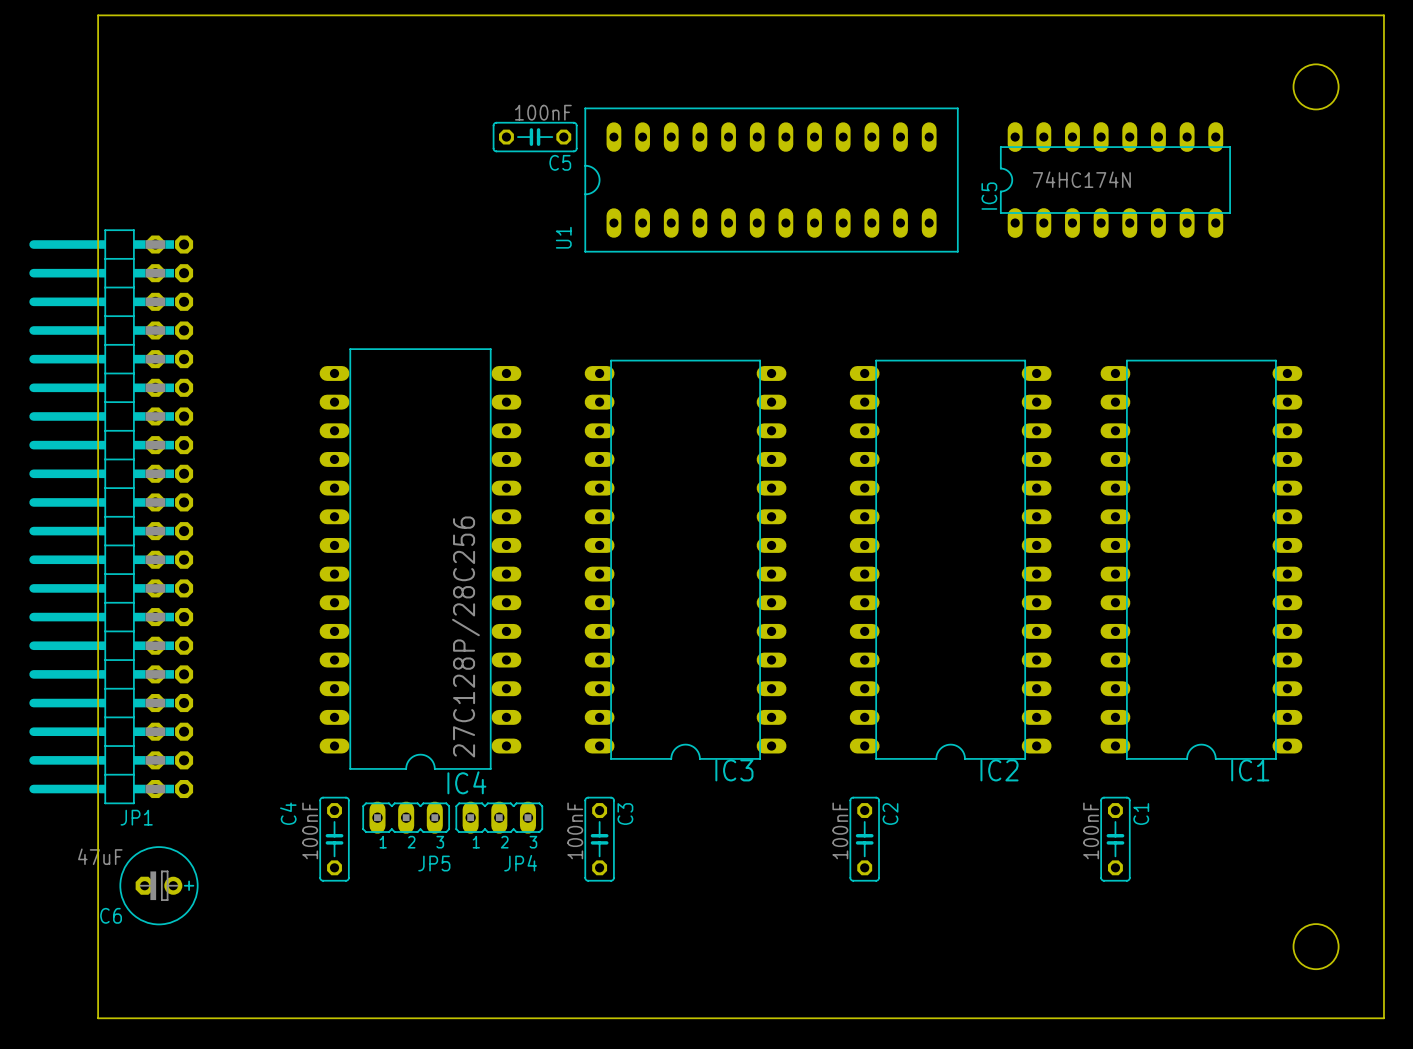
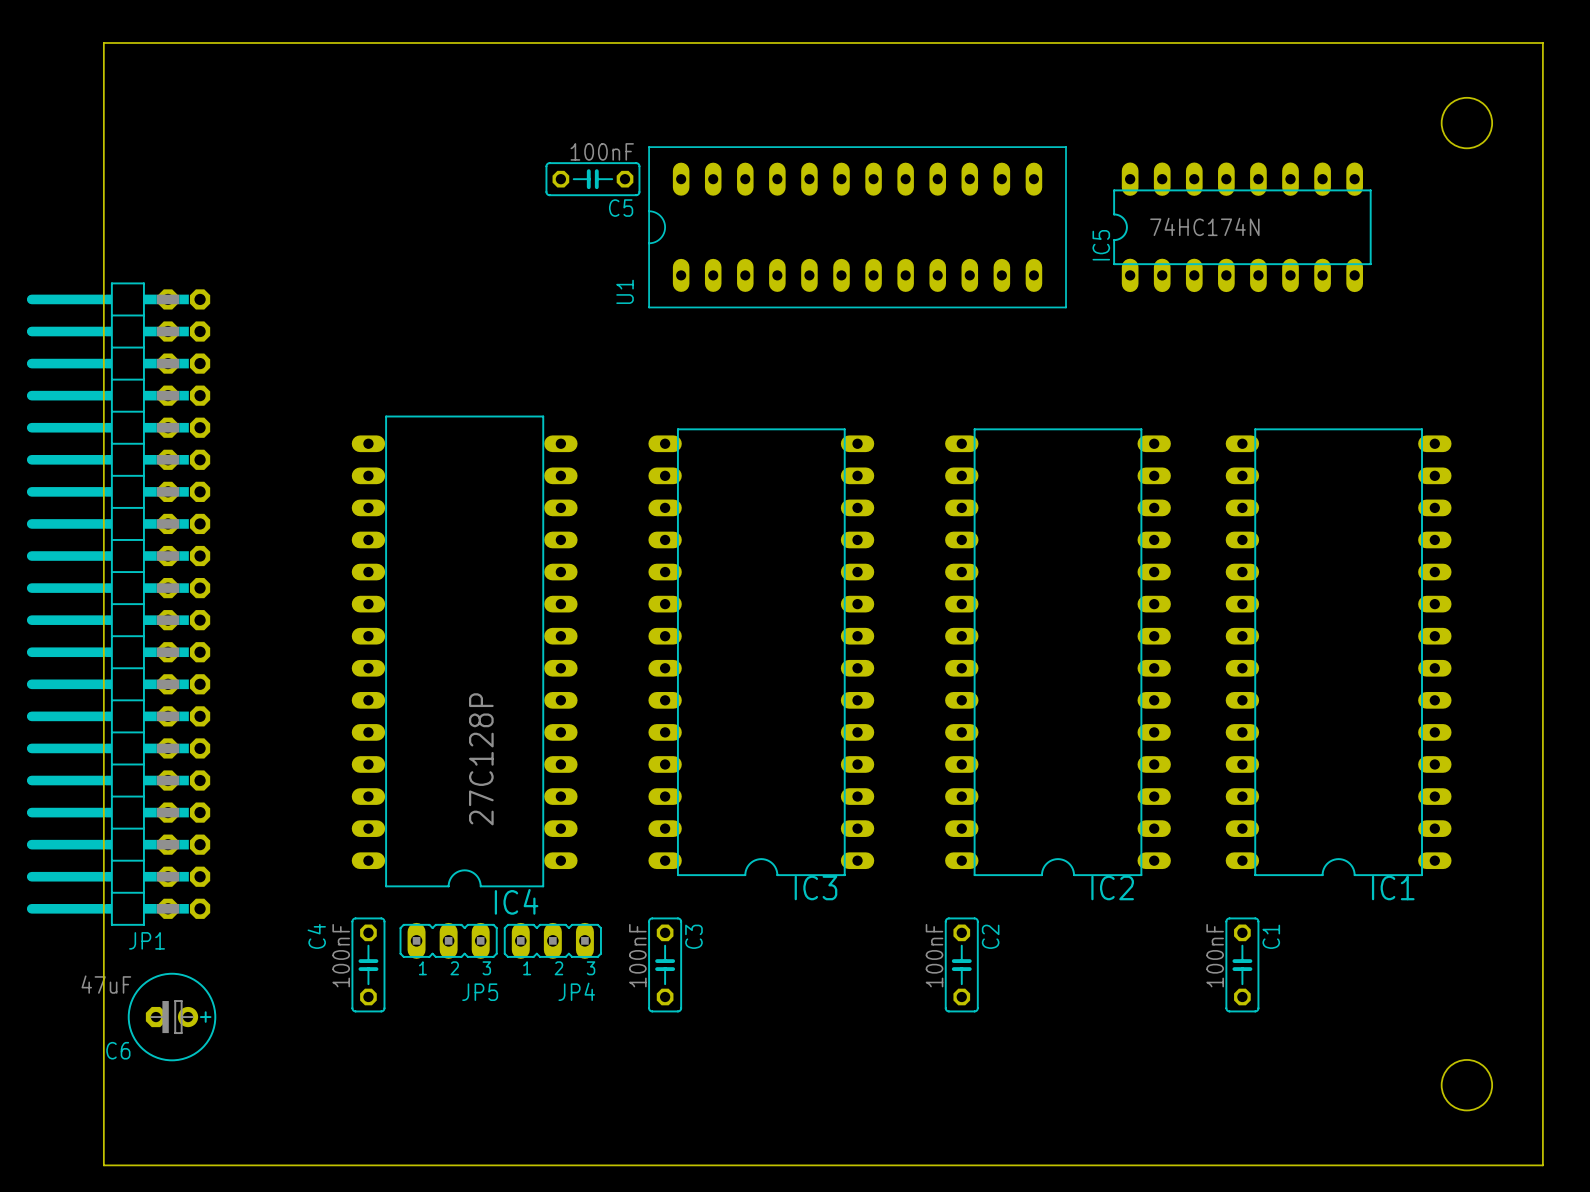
IC4 value: 27C128P/28C256 (465, 636) -> 27C128P (481, 759)

